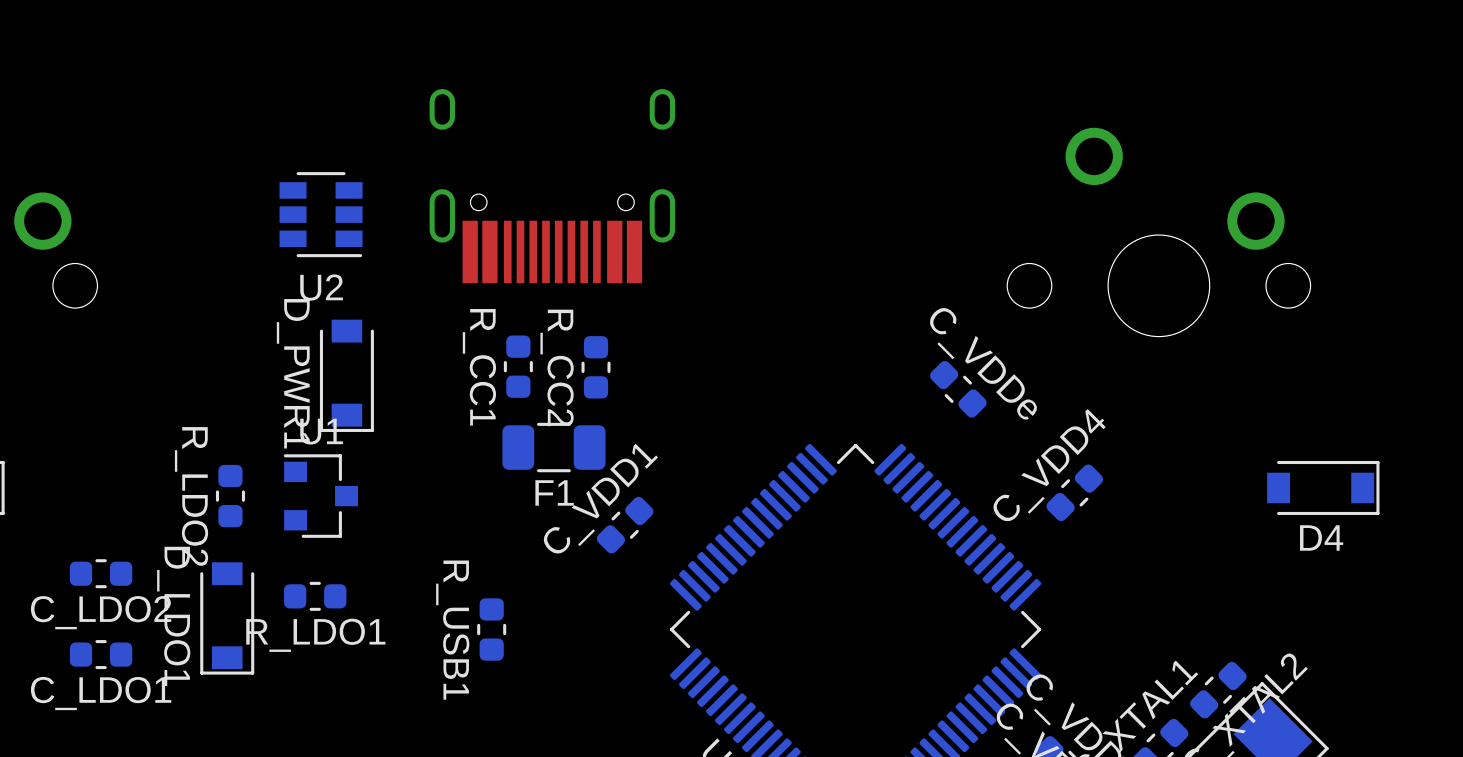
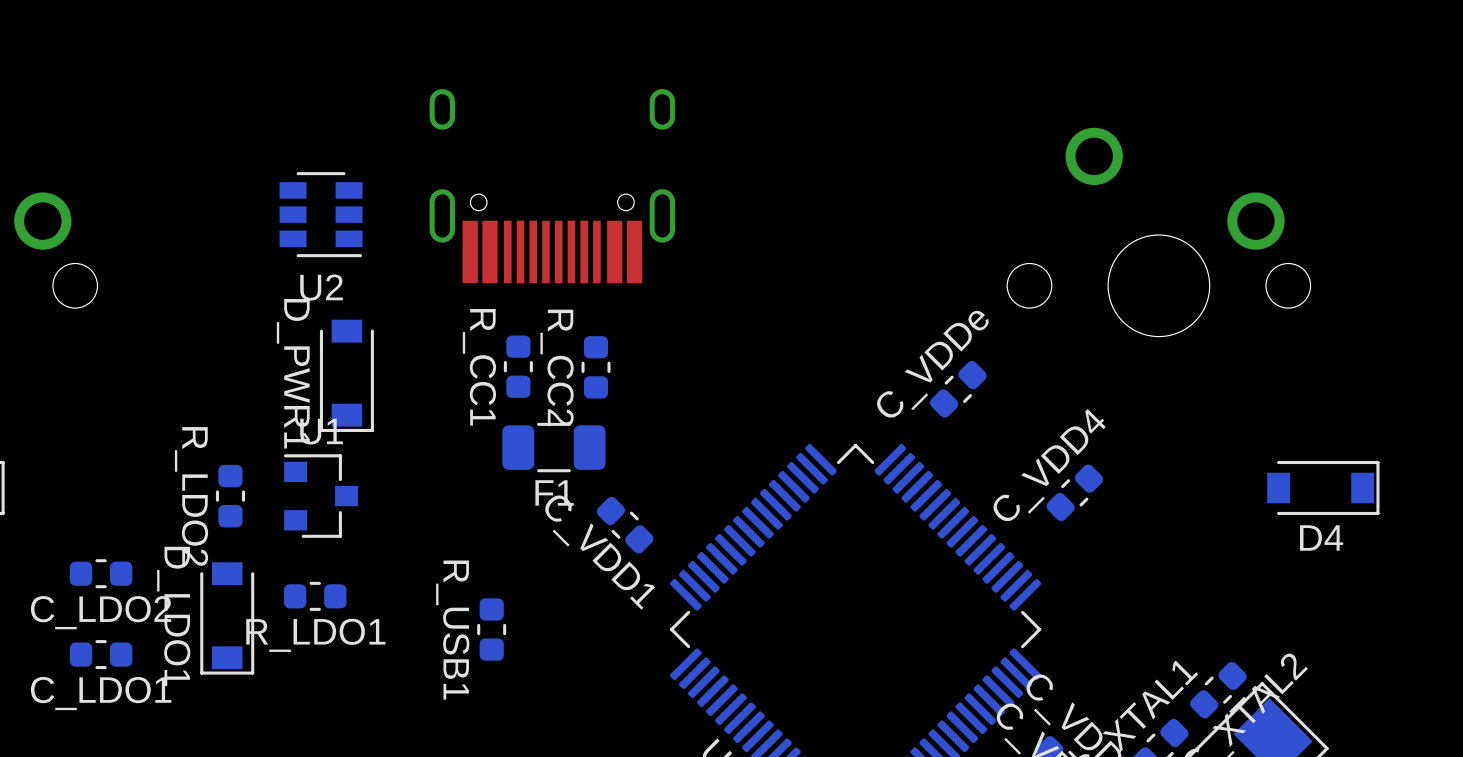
C_VDDe name position: C_VDDe (984, 364) -> C_VDDe (933, 362)
C_VDDe rotation: 0° (958, 389) -> 90° clockwise (958, 389)
C_VDD1 name position: C_VDD1 (600, 498) -> C_VDD1 (599, 552)
C_VDD1 rotation: 0° (625, 525) -> 90° clockwise (625, 525)

